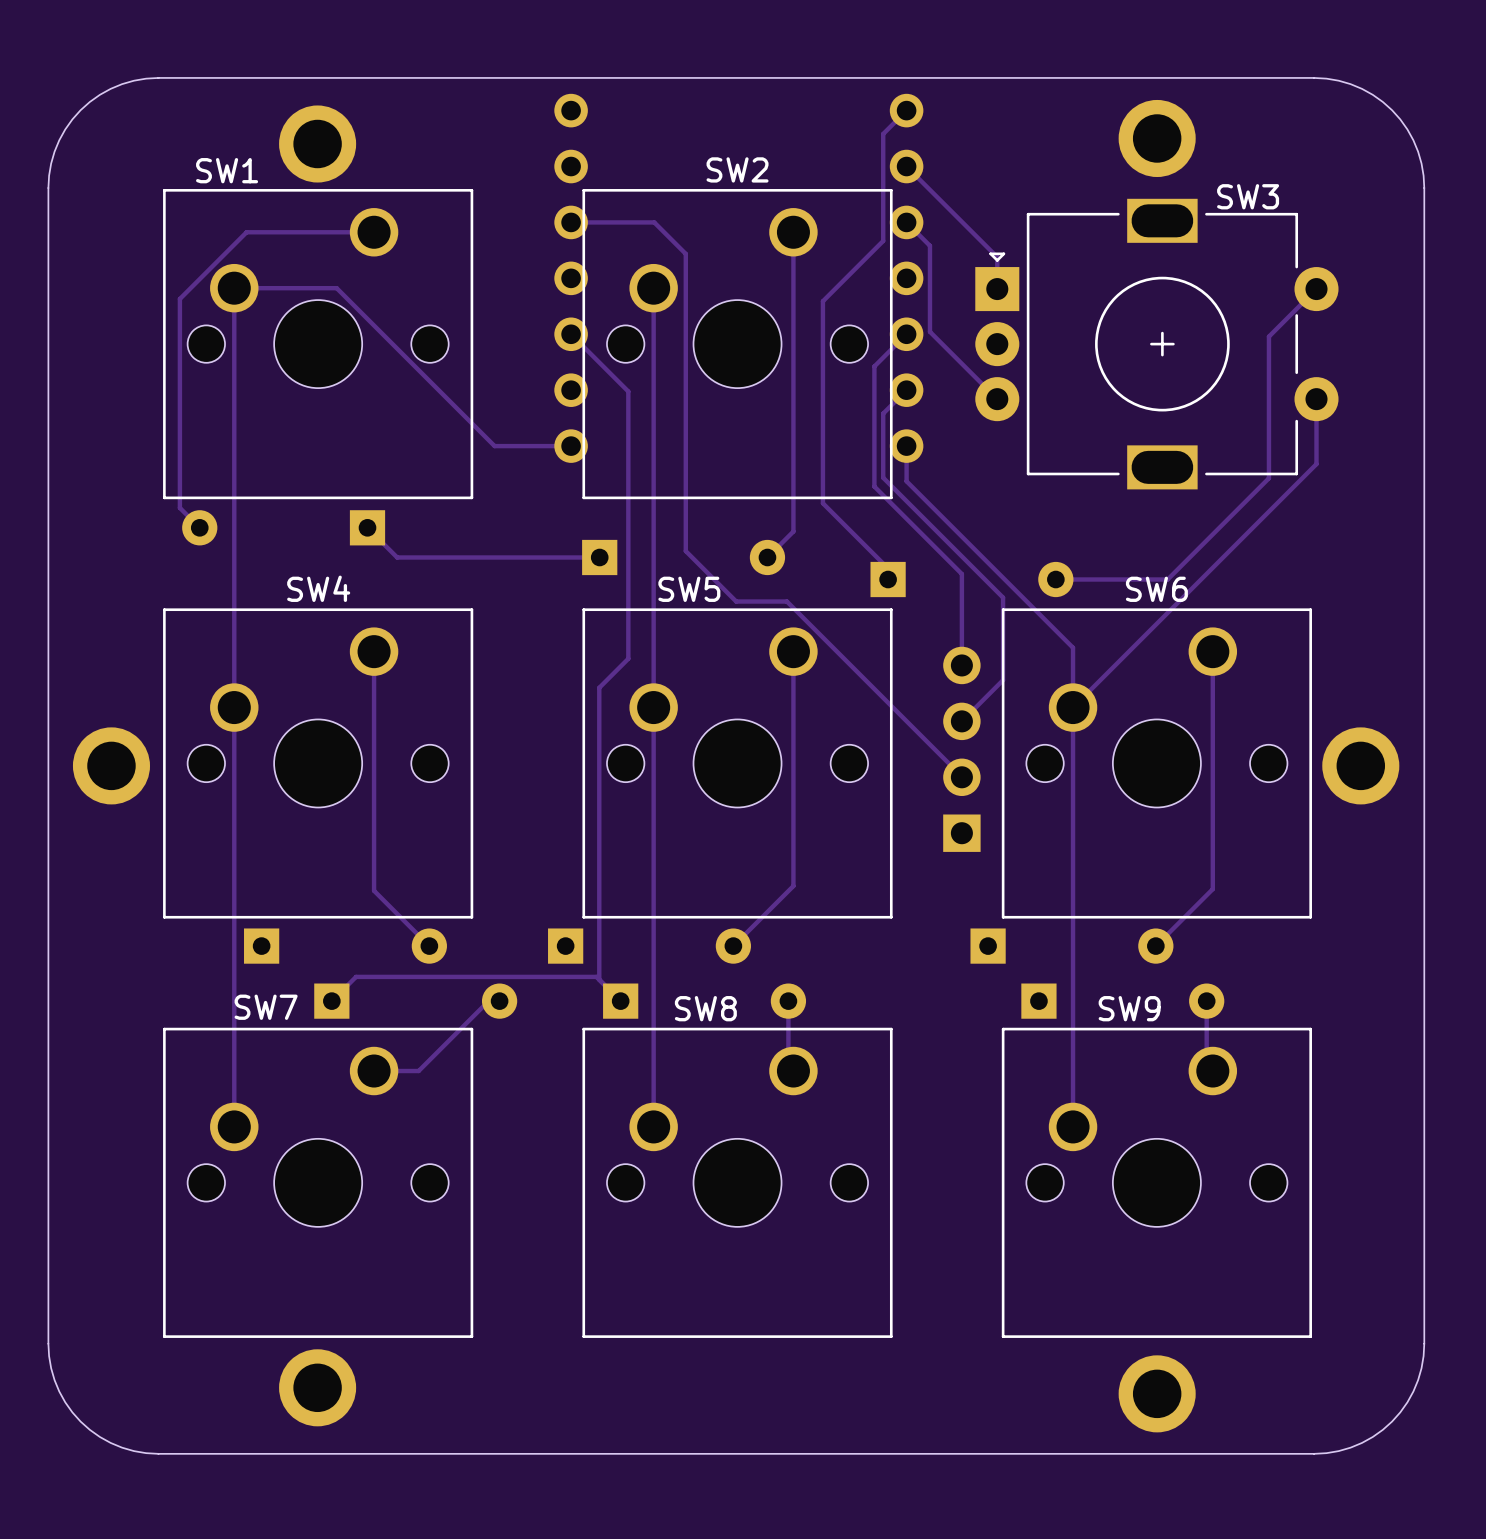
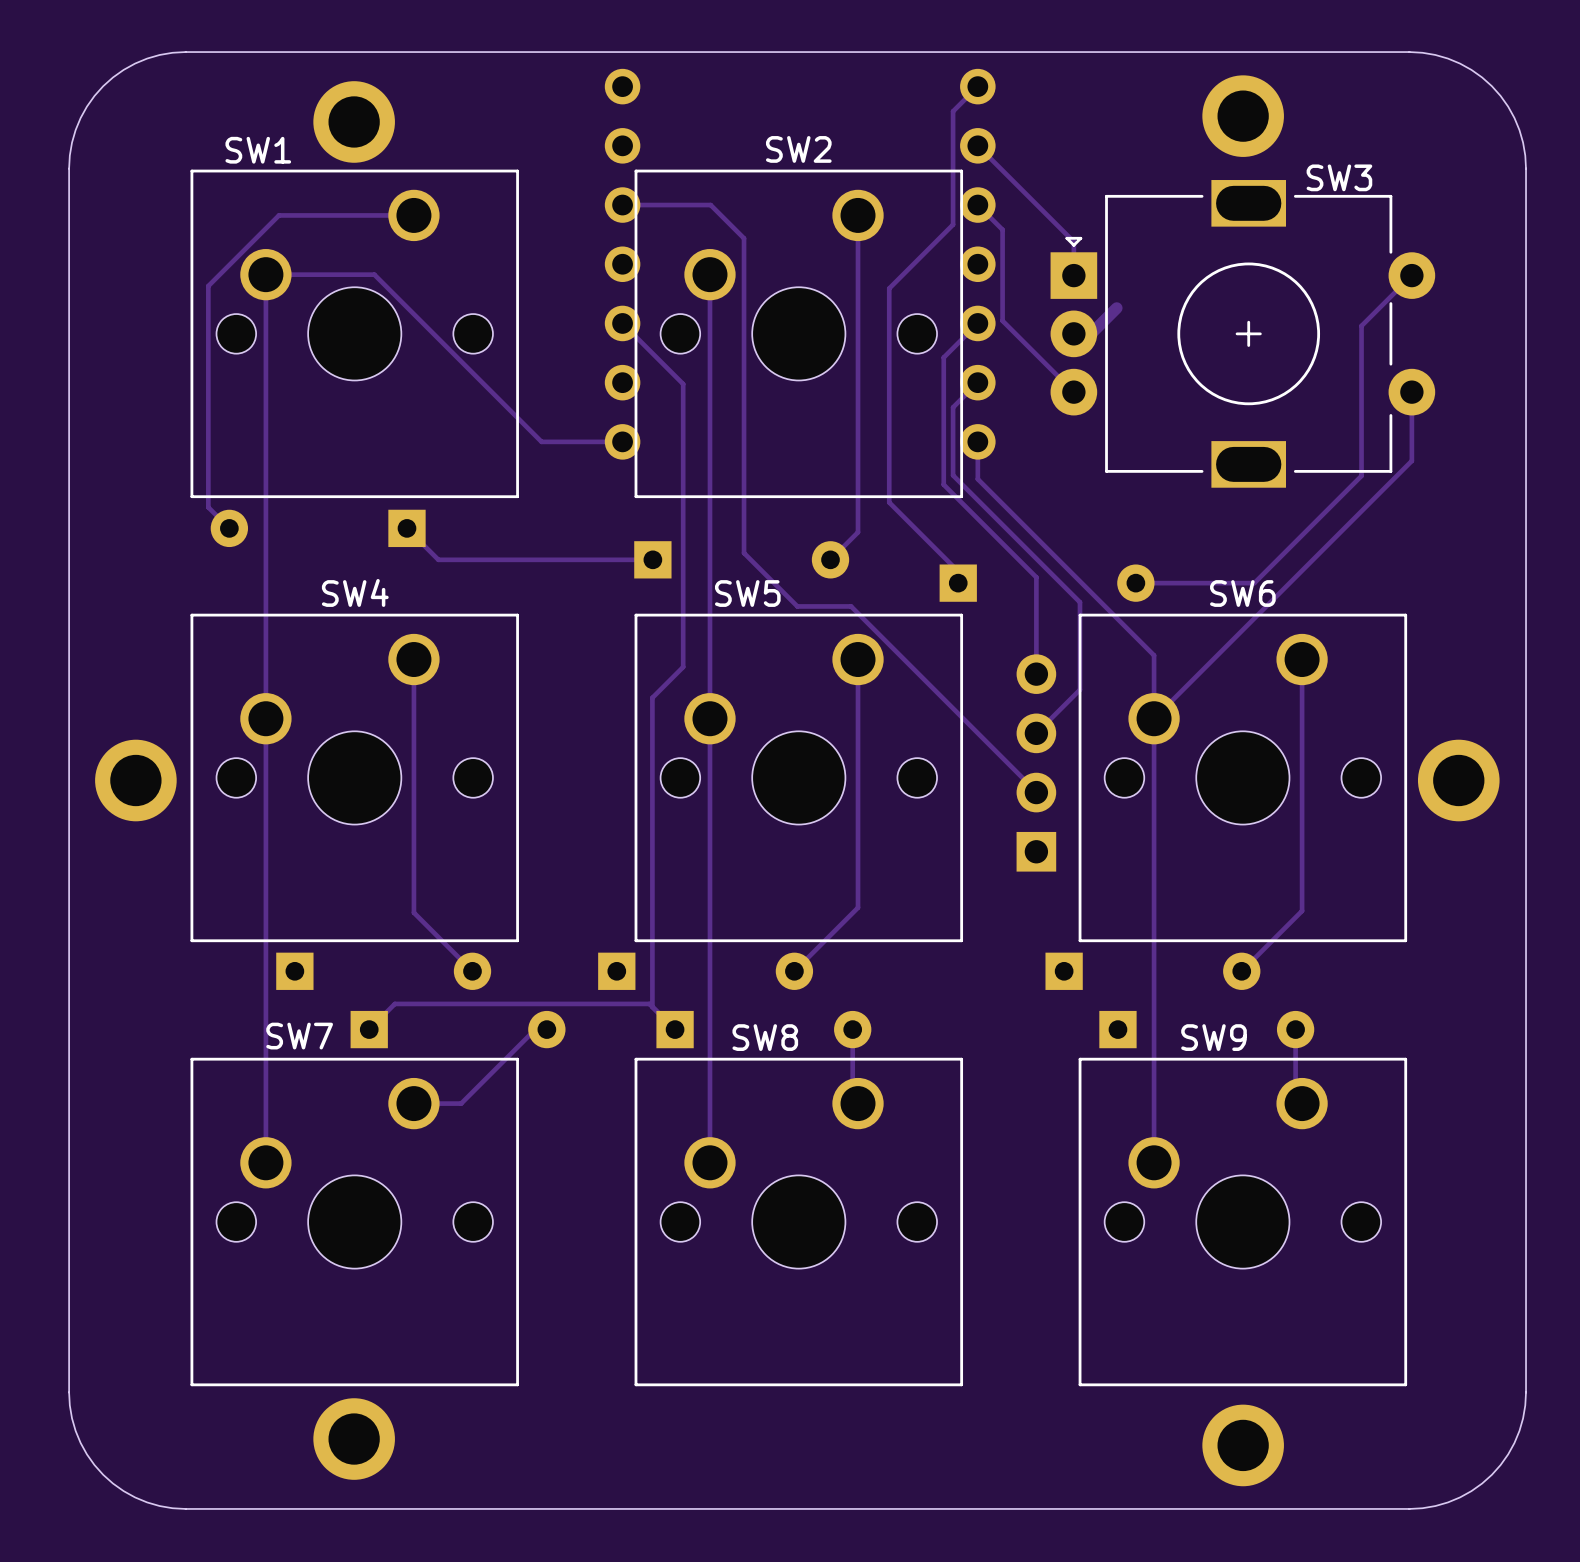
track: none -> (1116, 308) (1090, 333) (1073, 333)

